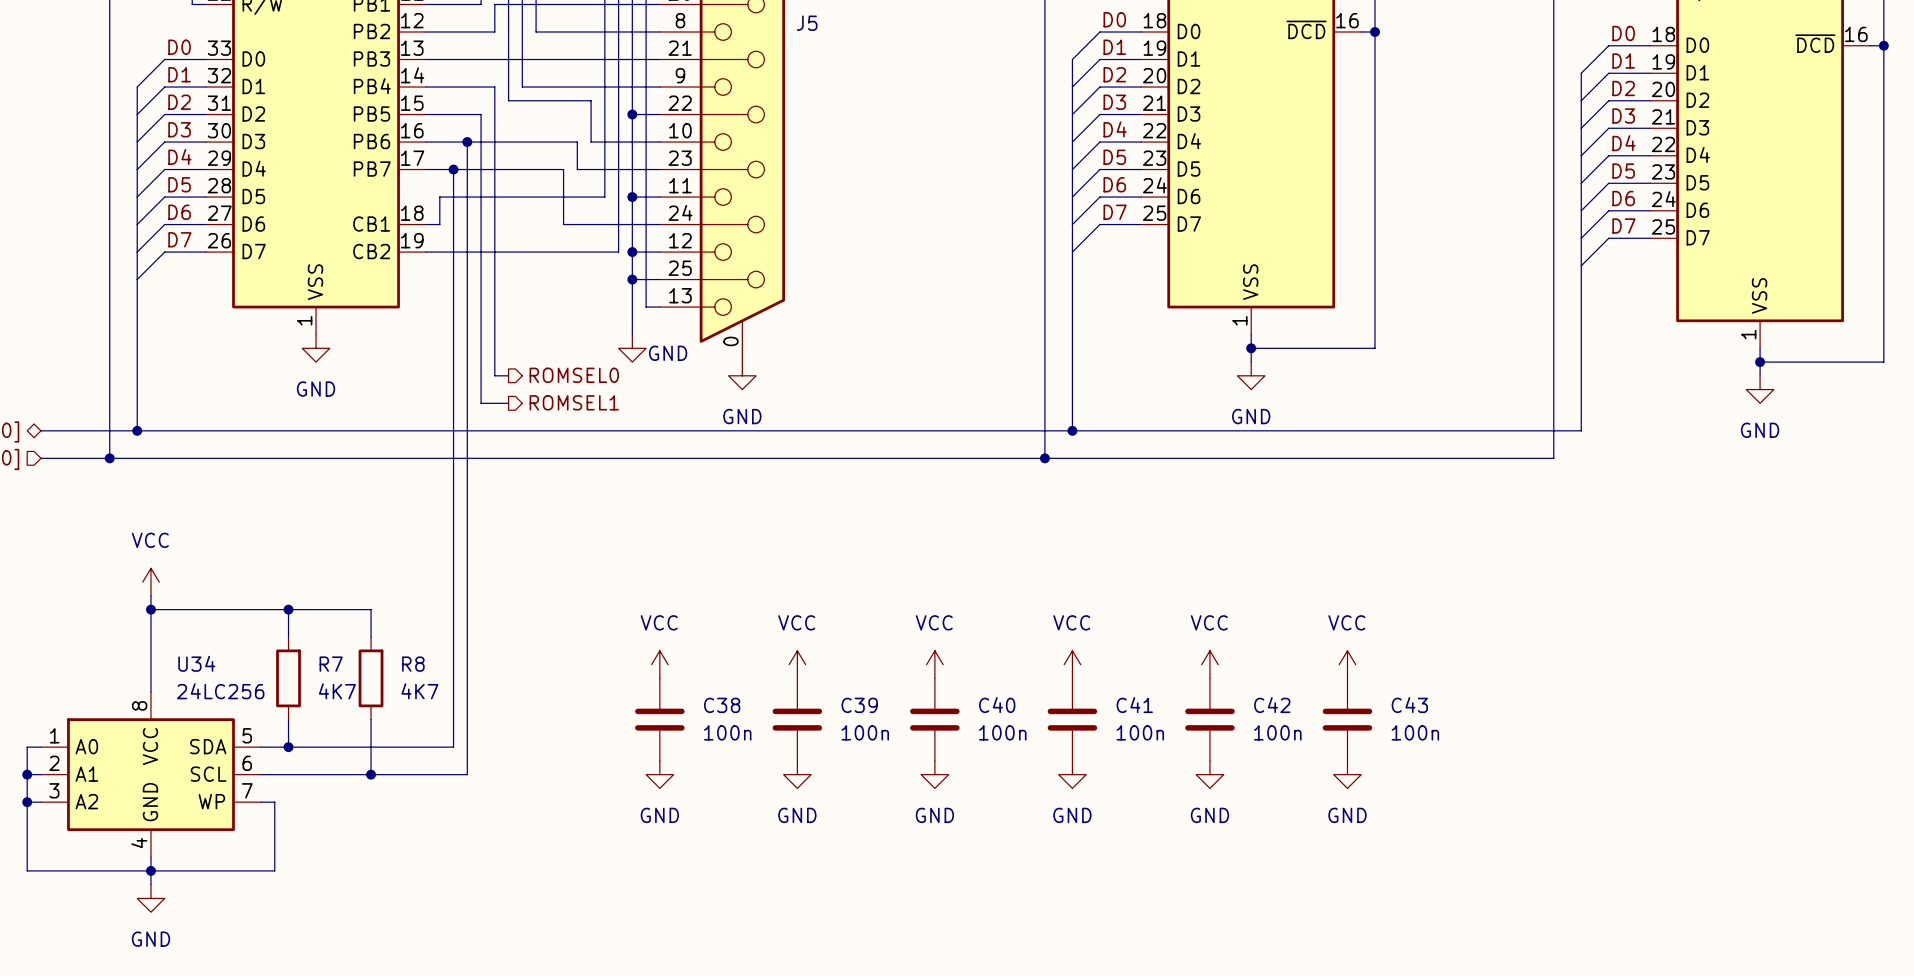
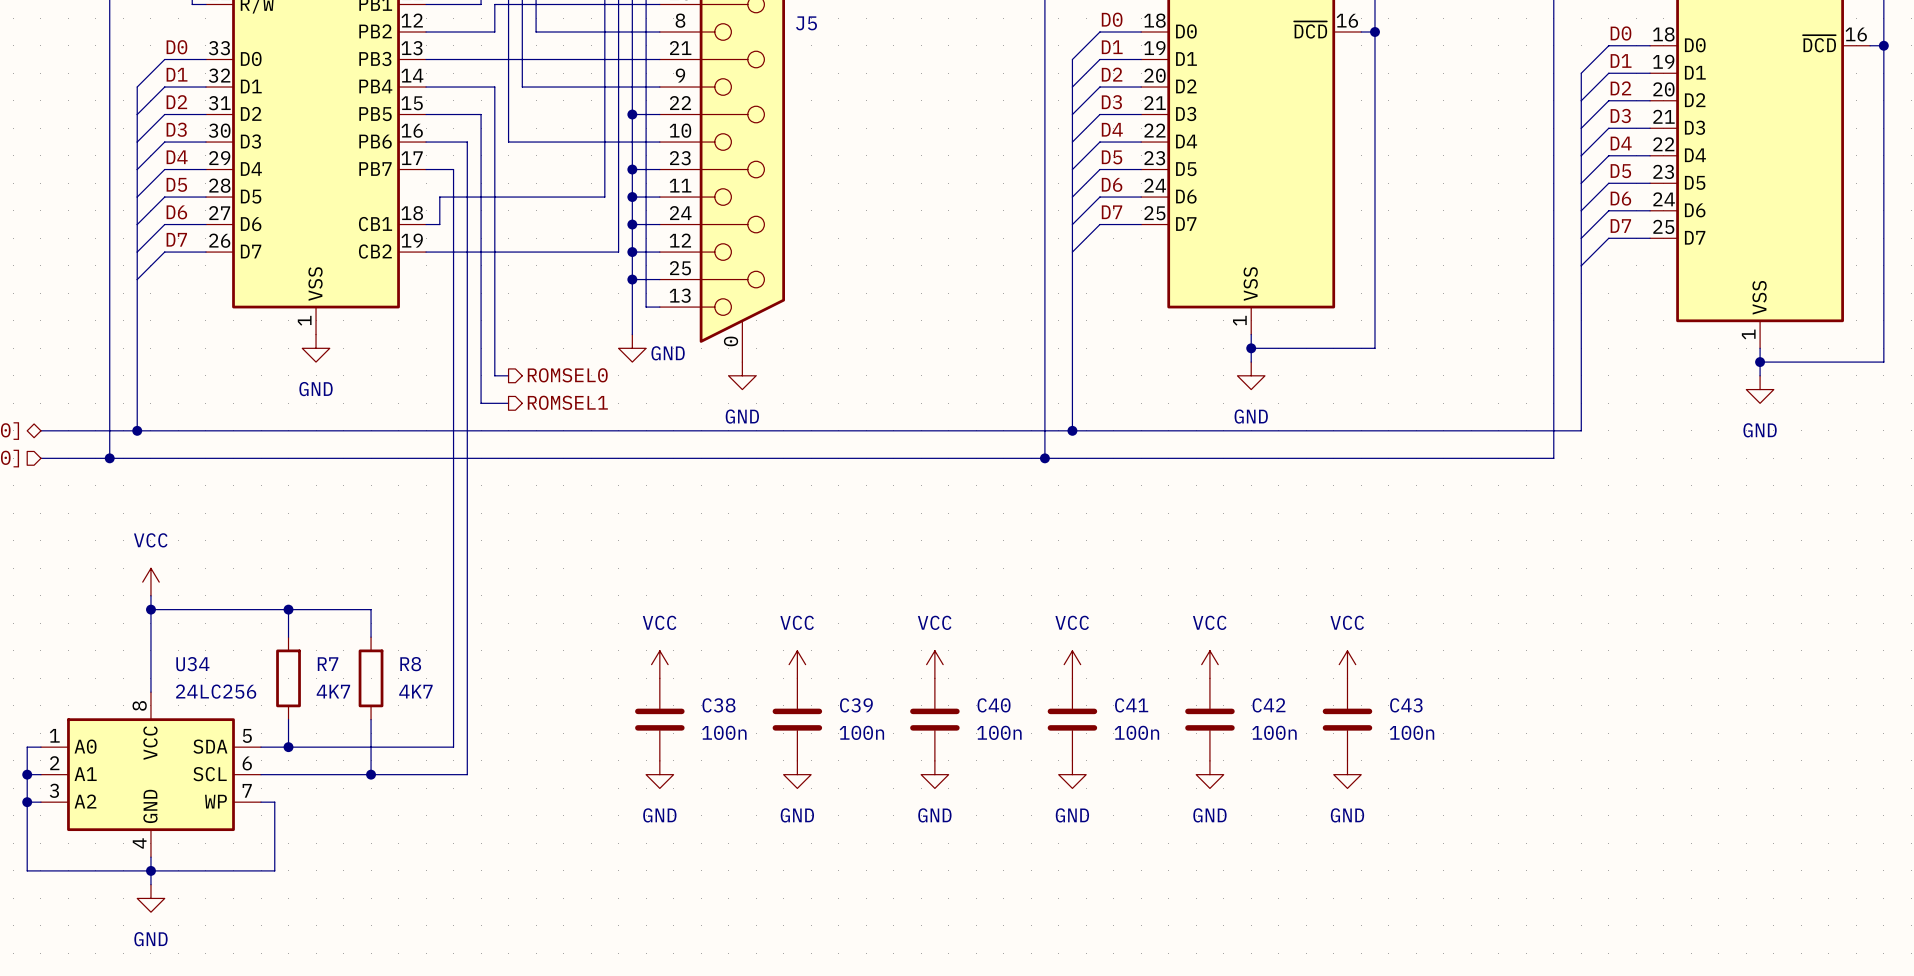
wire: (508, 100) (591, 100) (591, 142) -> none
wire: (467, 142) (508, 142) -> (508, 100) (508, 142)
junction: (467, 142) -> none
wire: (577, 142) (577, 169) (632, 169) -> (577, 142) (591, 142)
wire: (453, 169) (563, 169) (563, 224) (632, 224) -> none
junction: (453, 169) -> none
junction: none -> (632, 169)
junction: none -> (632, 224)

